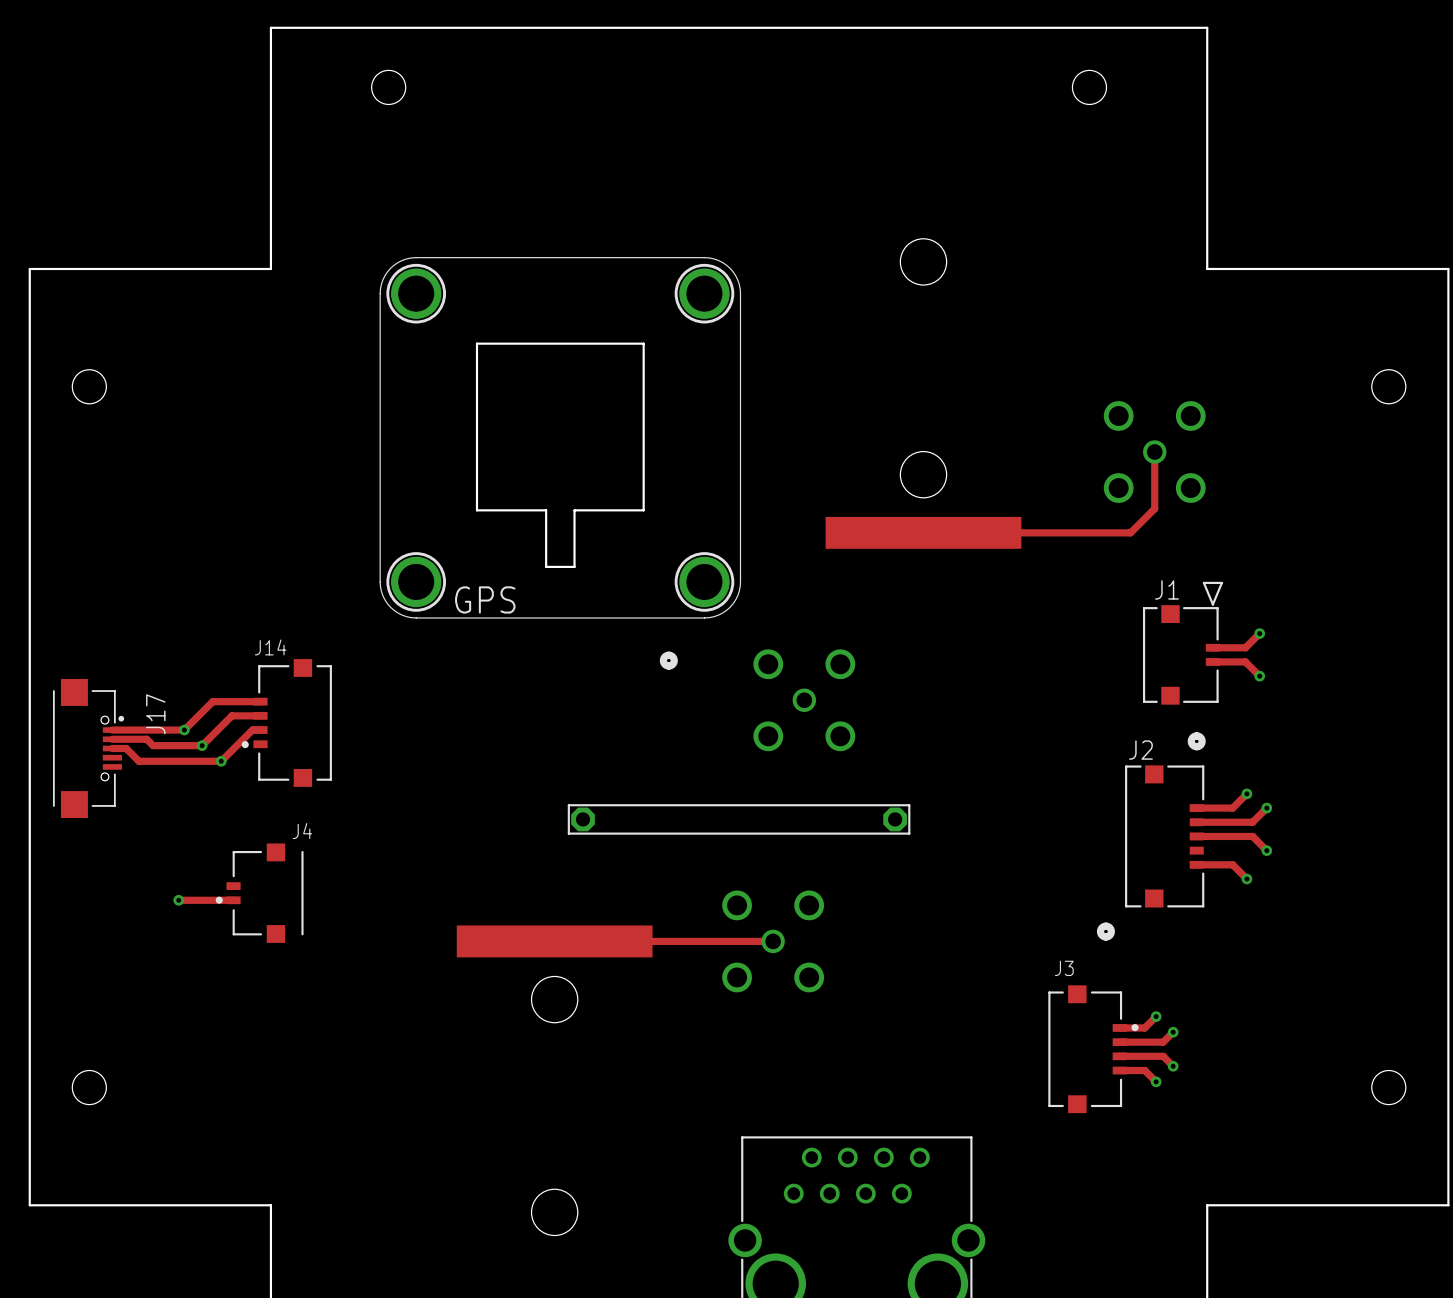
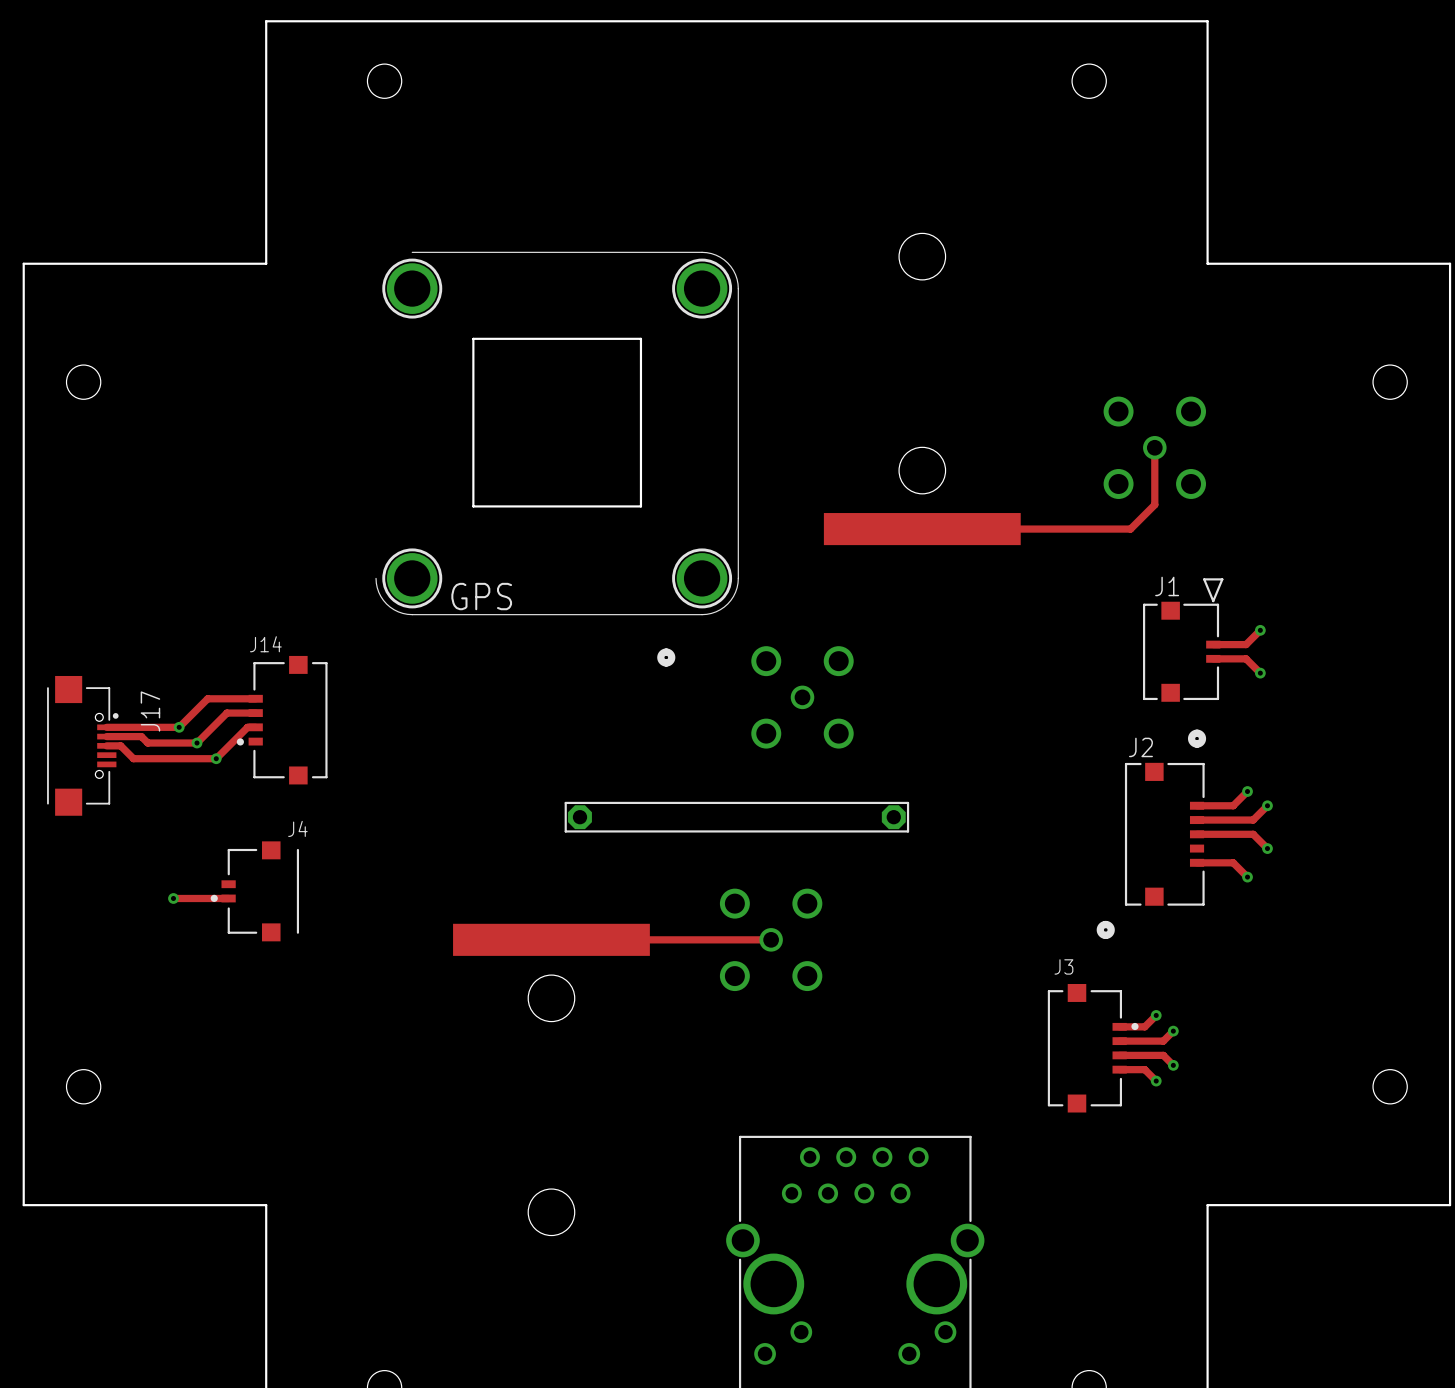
GPS footprint: [380, 257, 741, 618] -> [376, 252, 739, 615]

